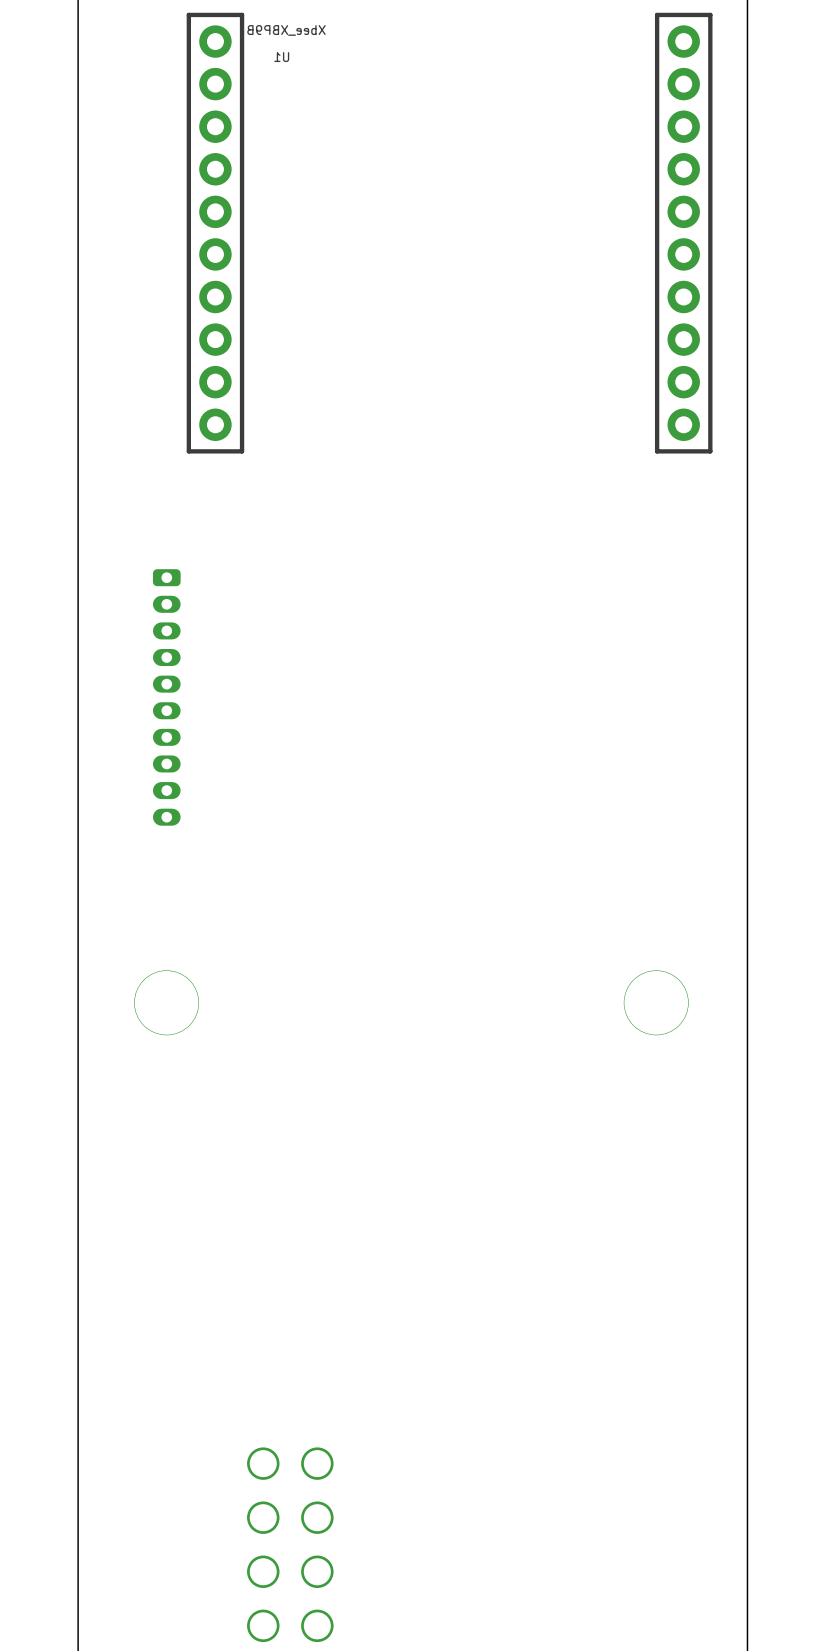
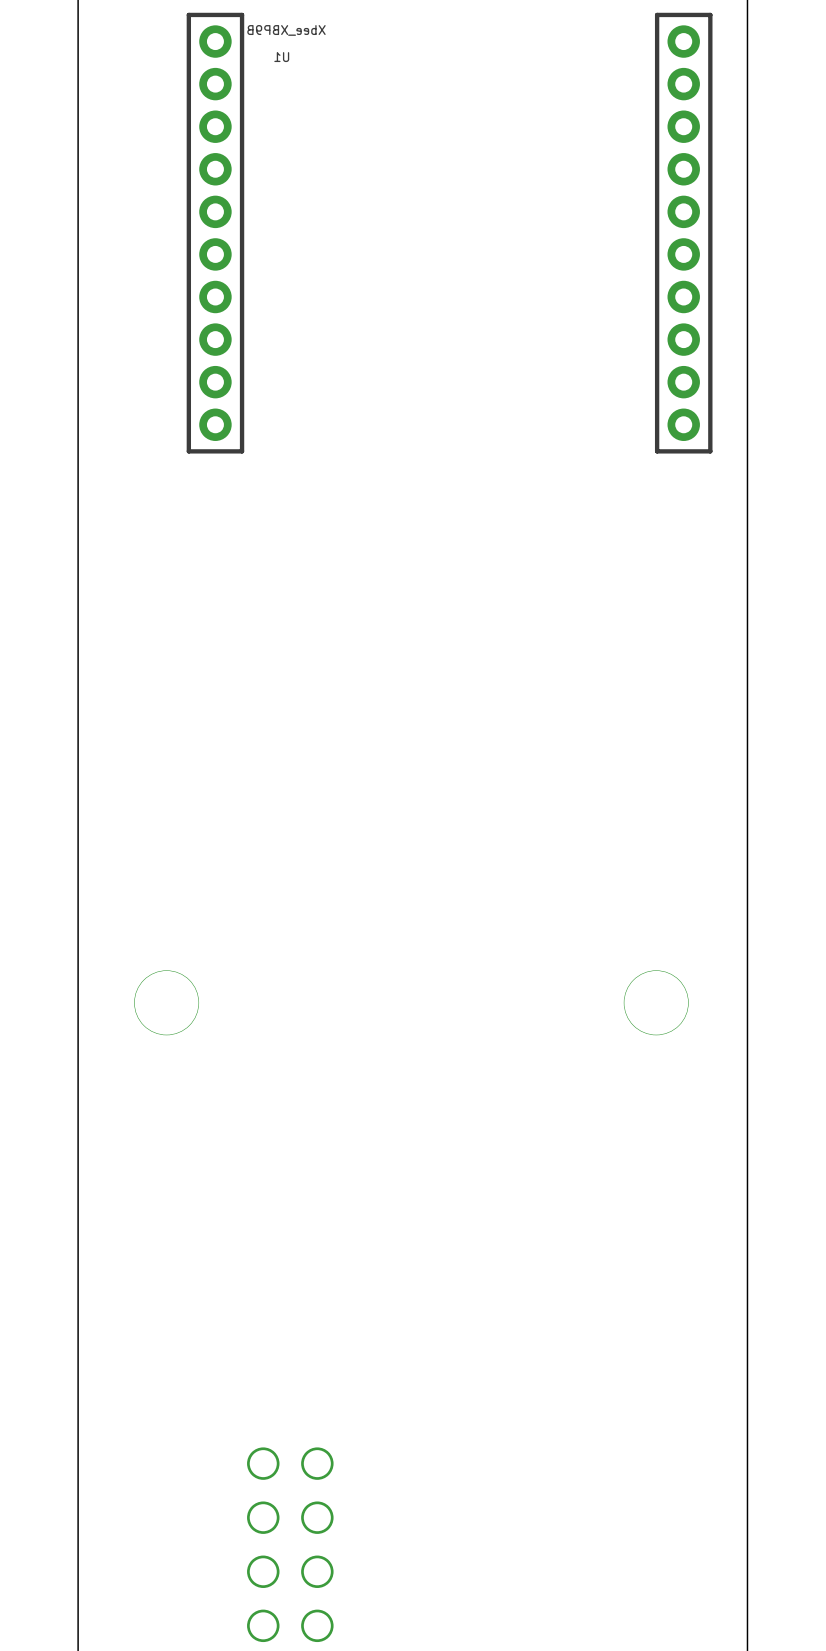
part: (166, 697) -> none

